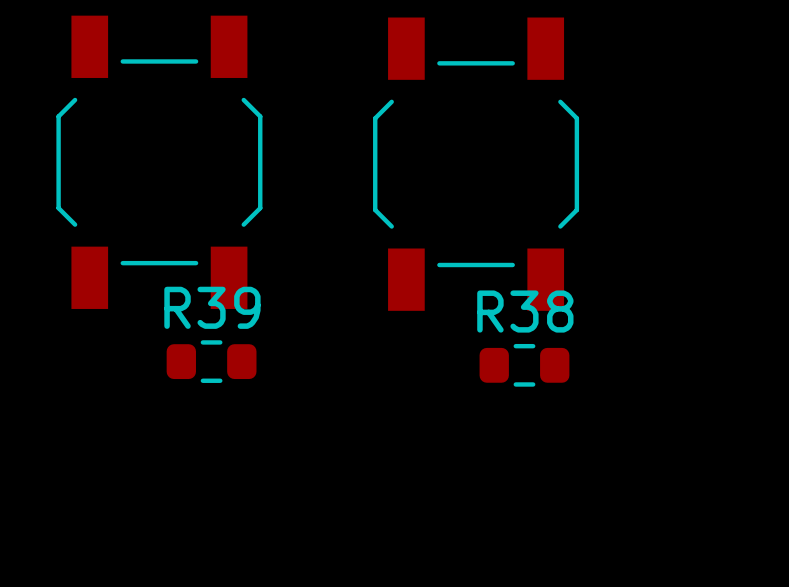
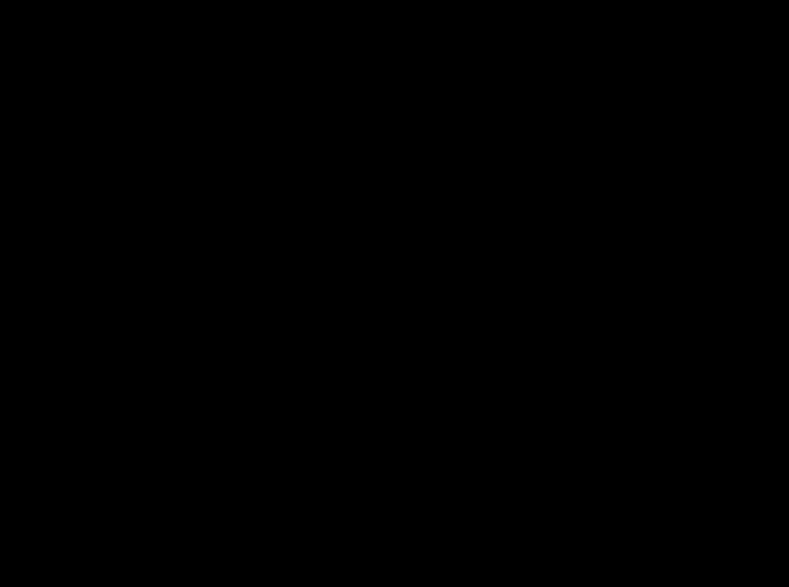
part: (159, 162) -> none
part: (476, 164) -> none
R39: (211, 361) -> none
R38: (524, 365) -> none

